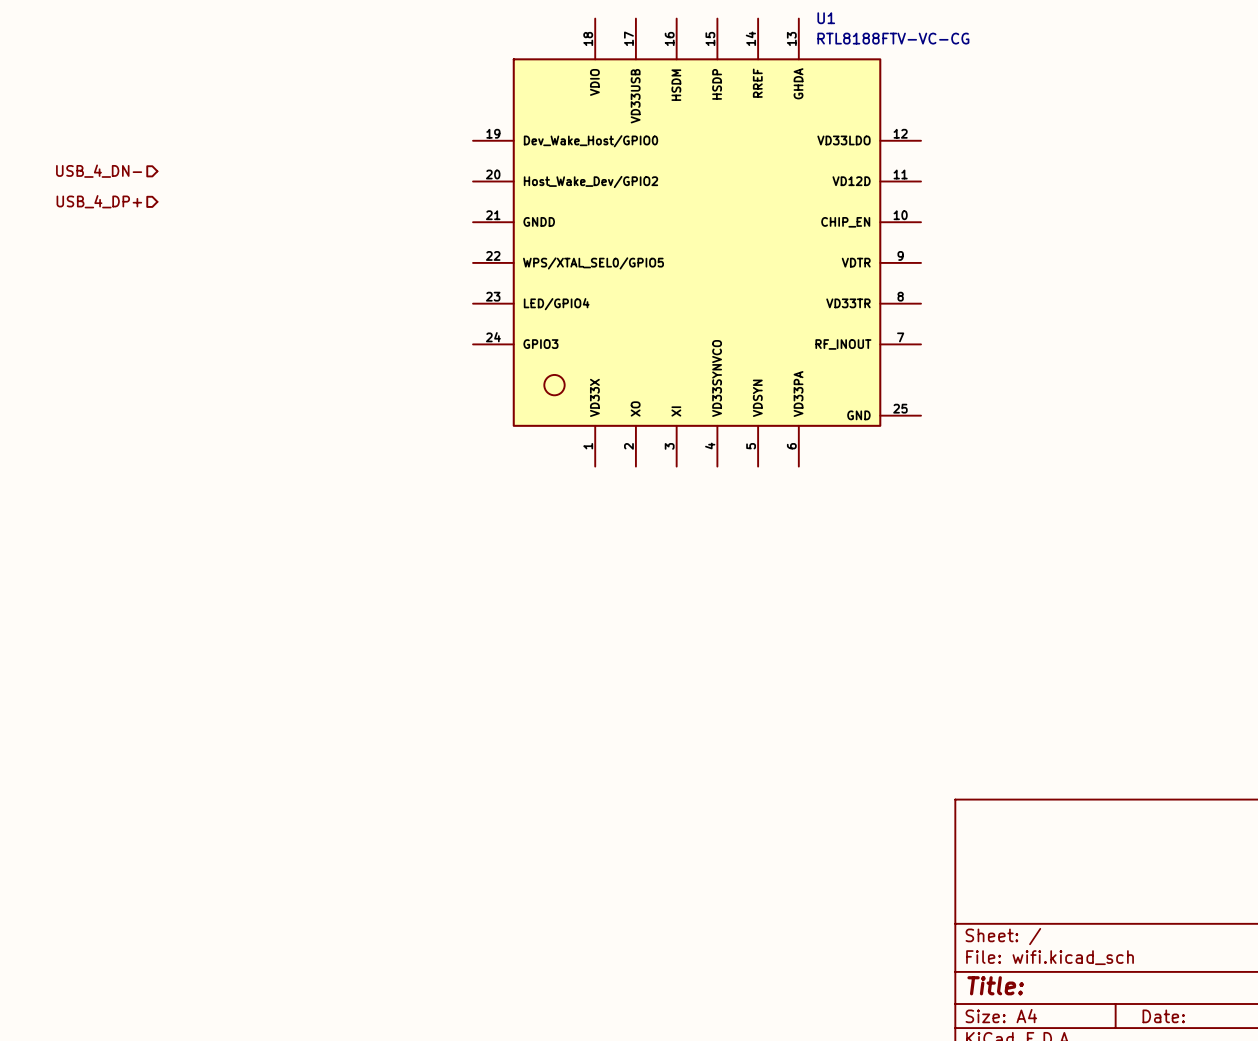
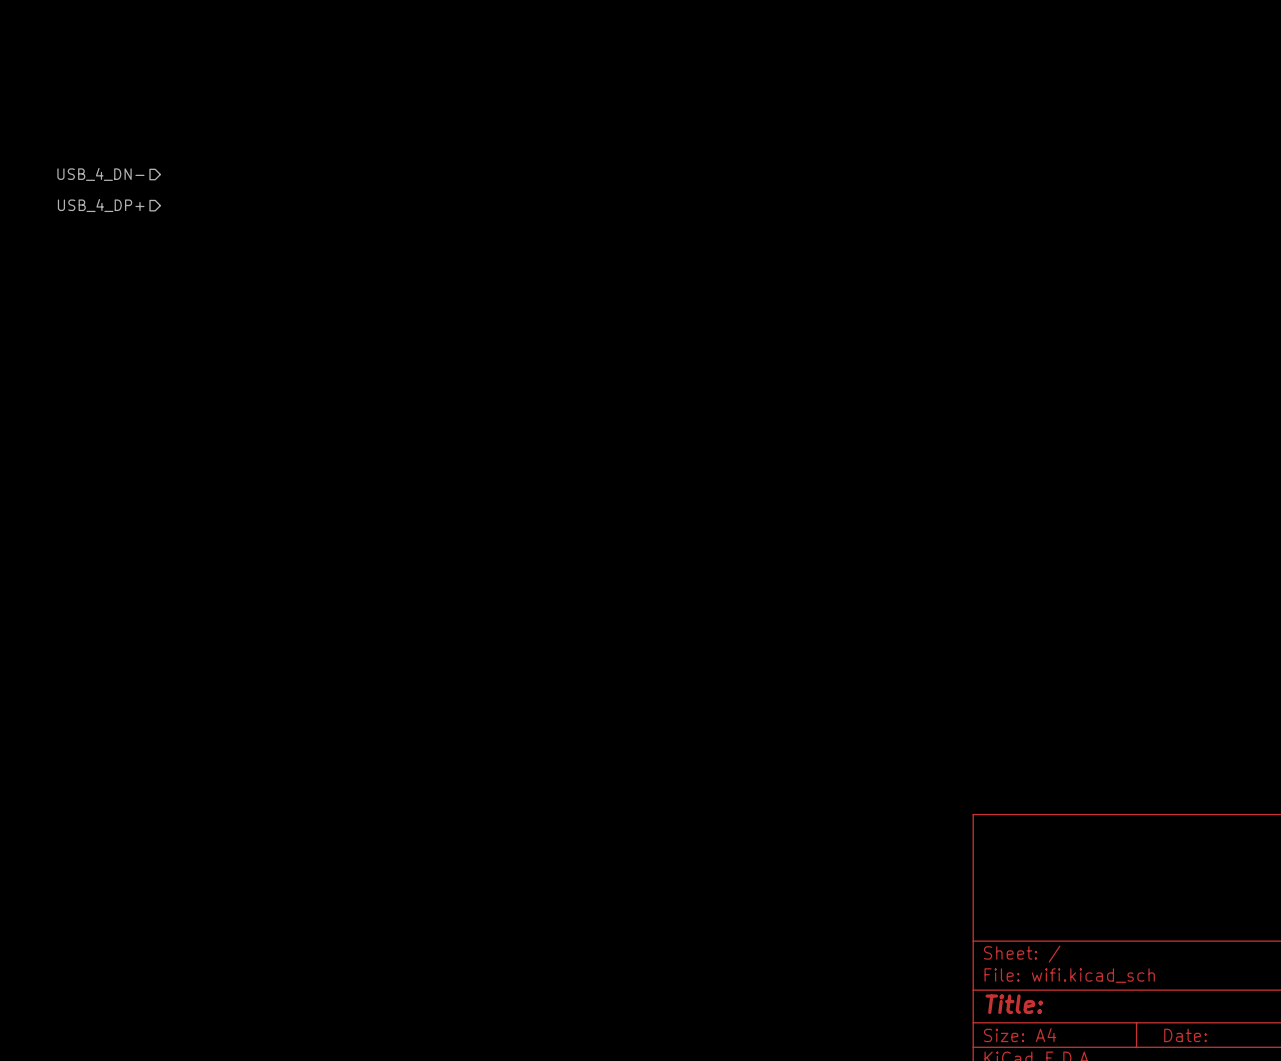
U1: RTL8188FTV-VC-CG (697, 242) -> none

